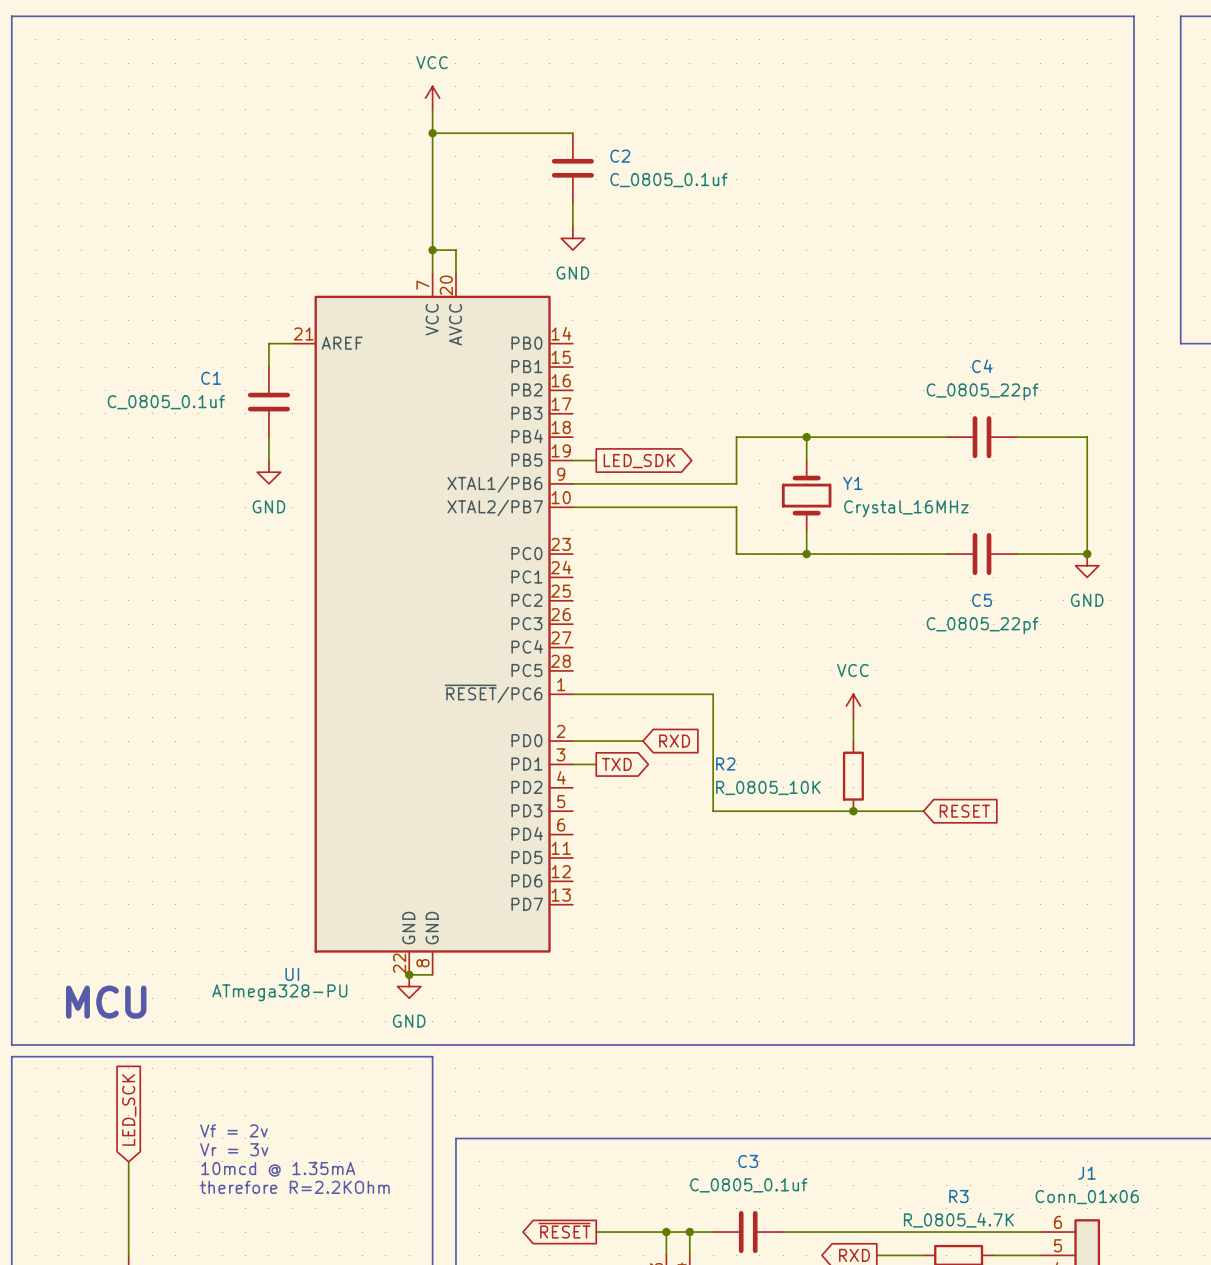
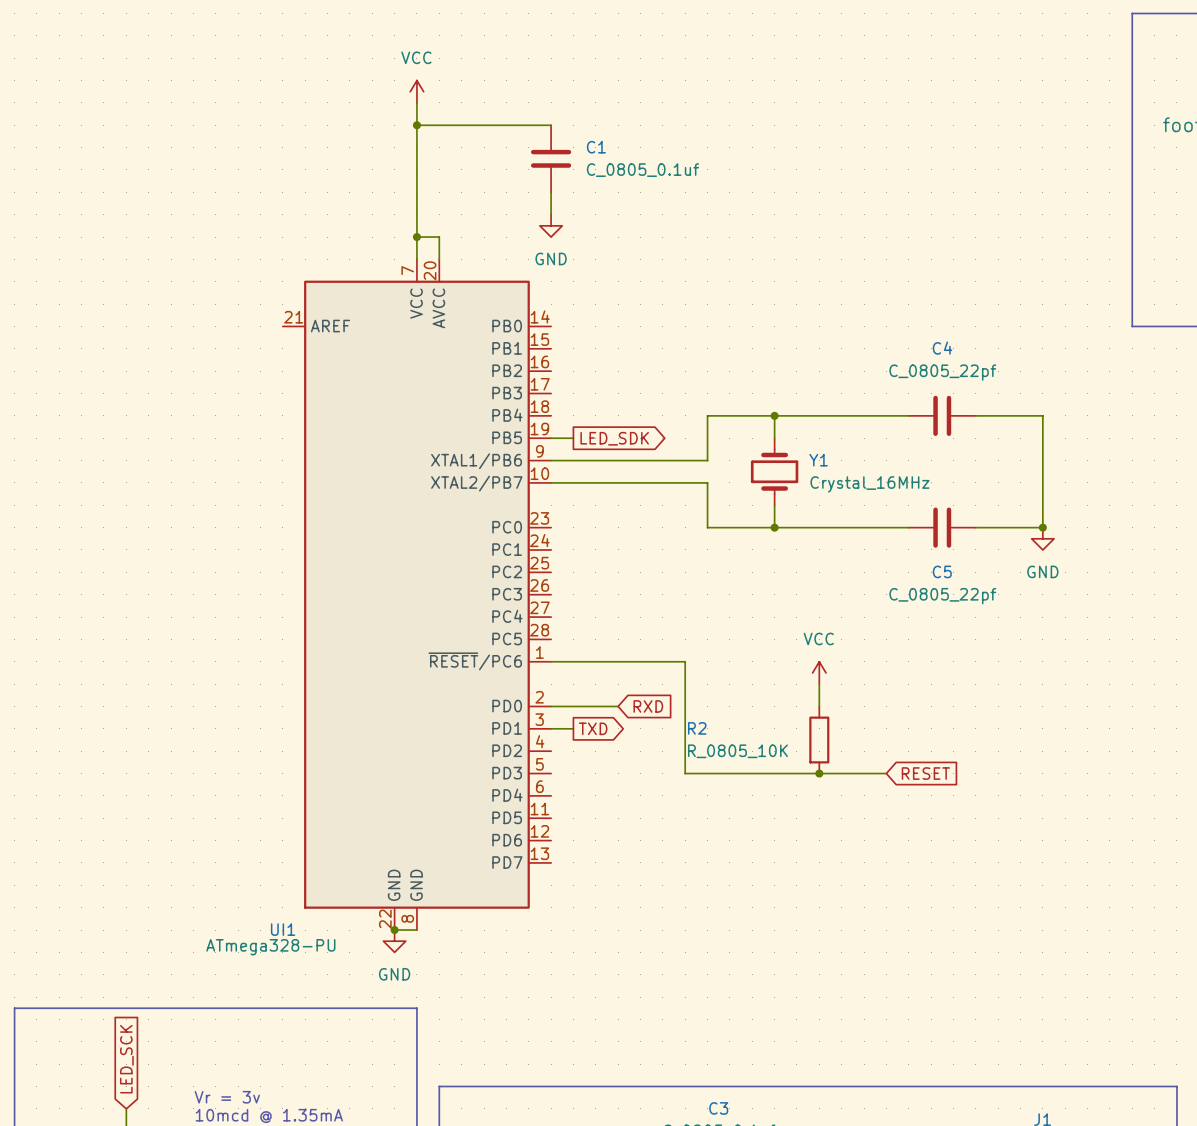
line: (11, 16) (11, 1044) (1133, 1044) (1133, 16) (11, 16) -> none
C2 name: C2 (620, 156) -> C1 (596, 147)
wire: (292, 343) (268, 343) (268, 367) -> none
C1: C_0805_0.1uf (268, 402) -> none
wire: (268, 437) (268, 460) -> none
power symbol: GND (268, 472) -> none
UI name: UI (292, 974) -> UI1 (283, 929)
text: MCU (106, 1002) -> none
text: Vf = 2v (233, 1130) -> none

